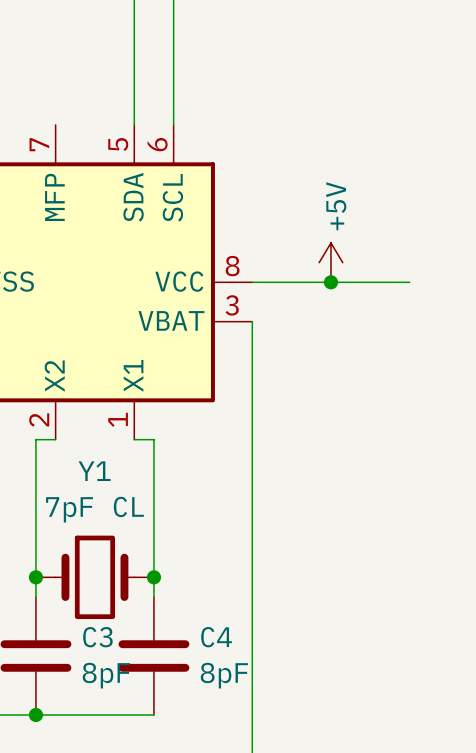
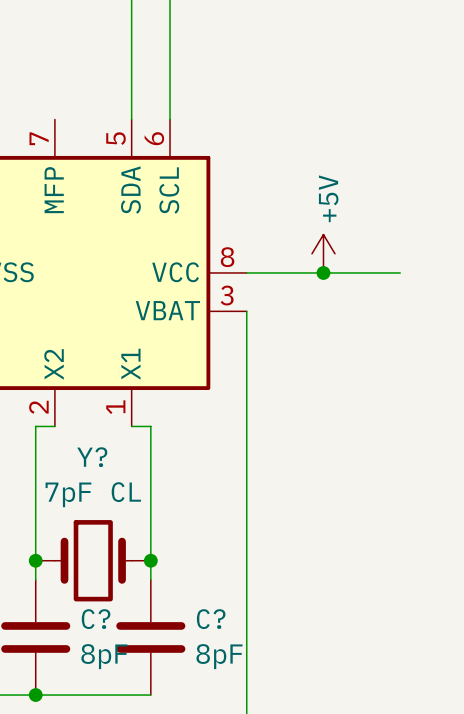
Y1 name: Y1 (94, 471) -> Y? (92, 457)
C3 name: C3 (97, 637) -> C? (96, 619)
C4 name: C4 (216, 637) -> C? (211, 619)

